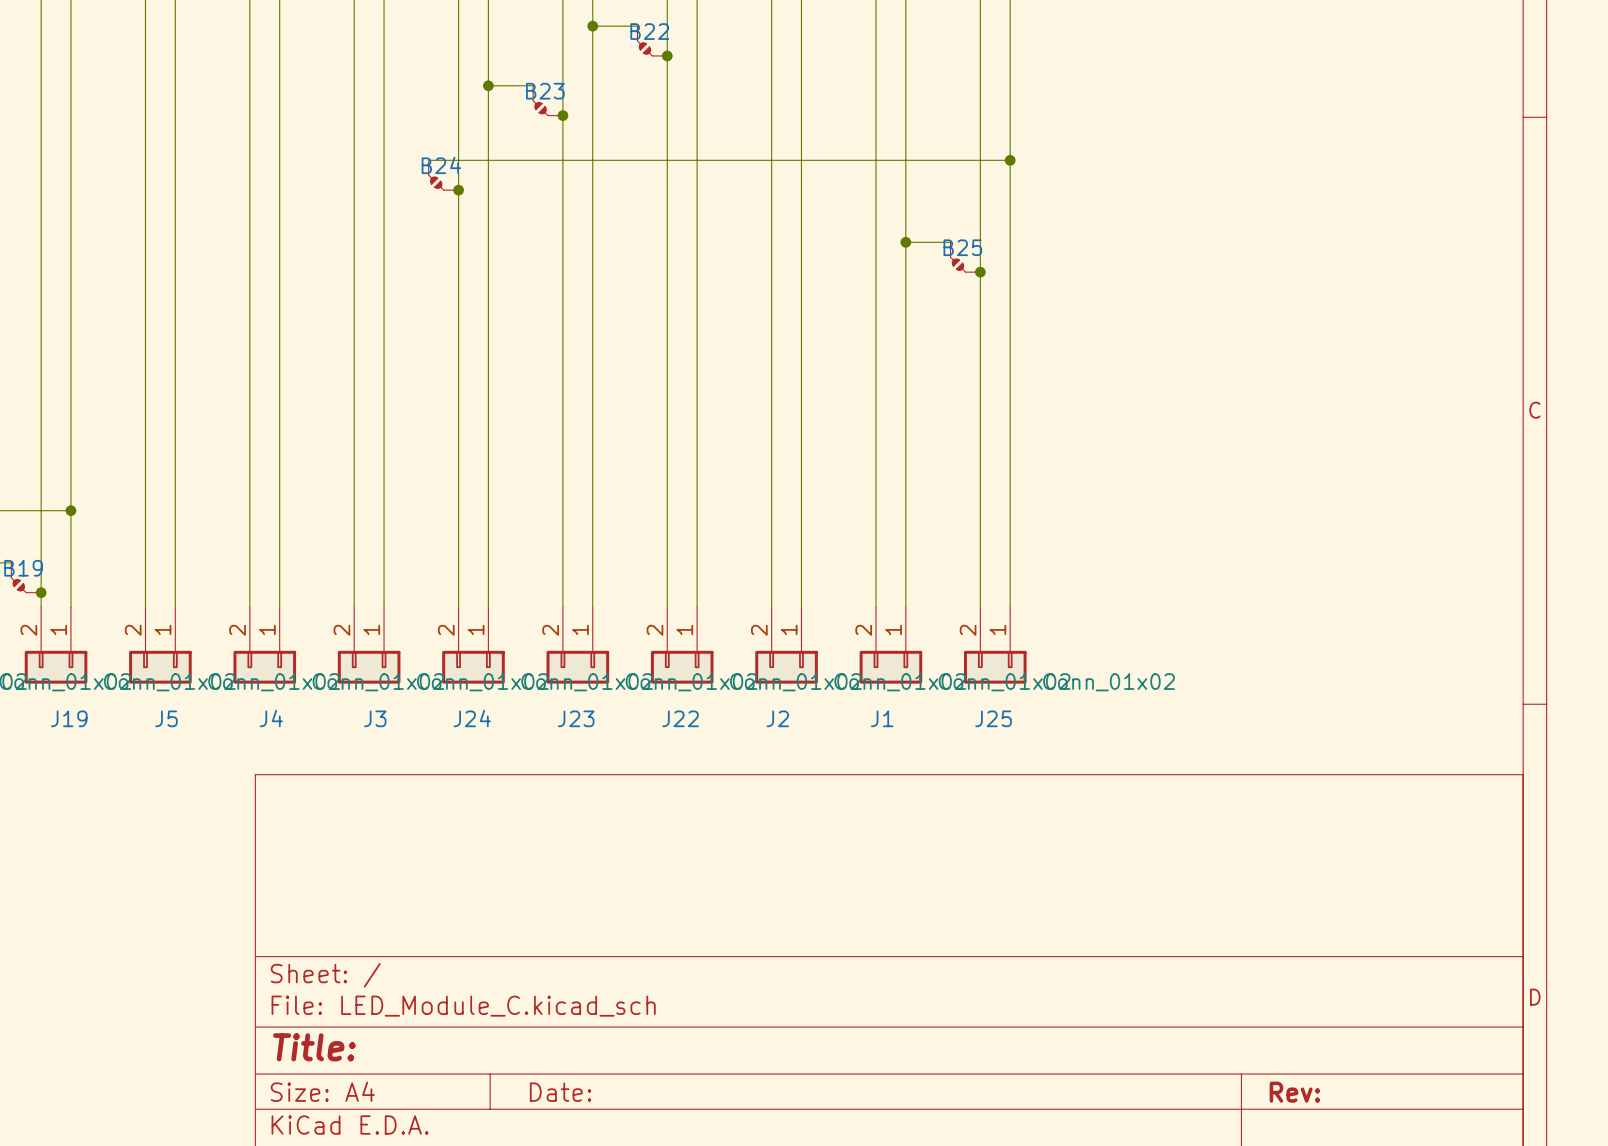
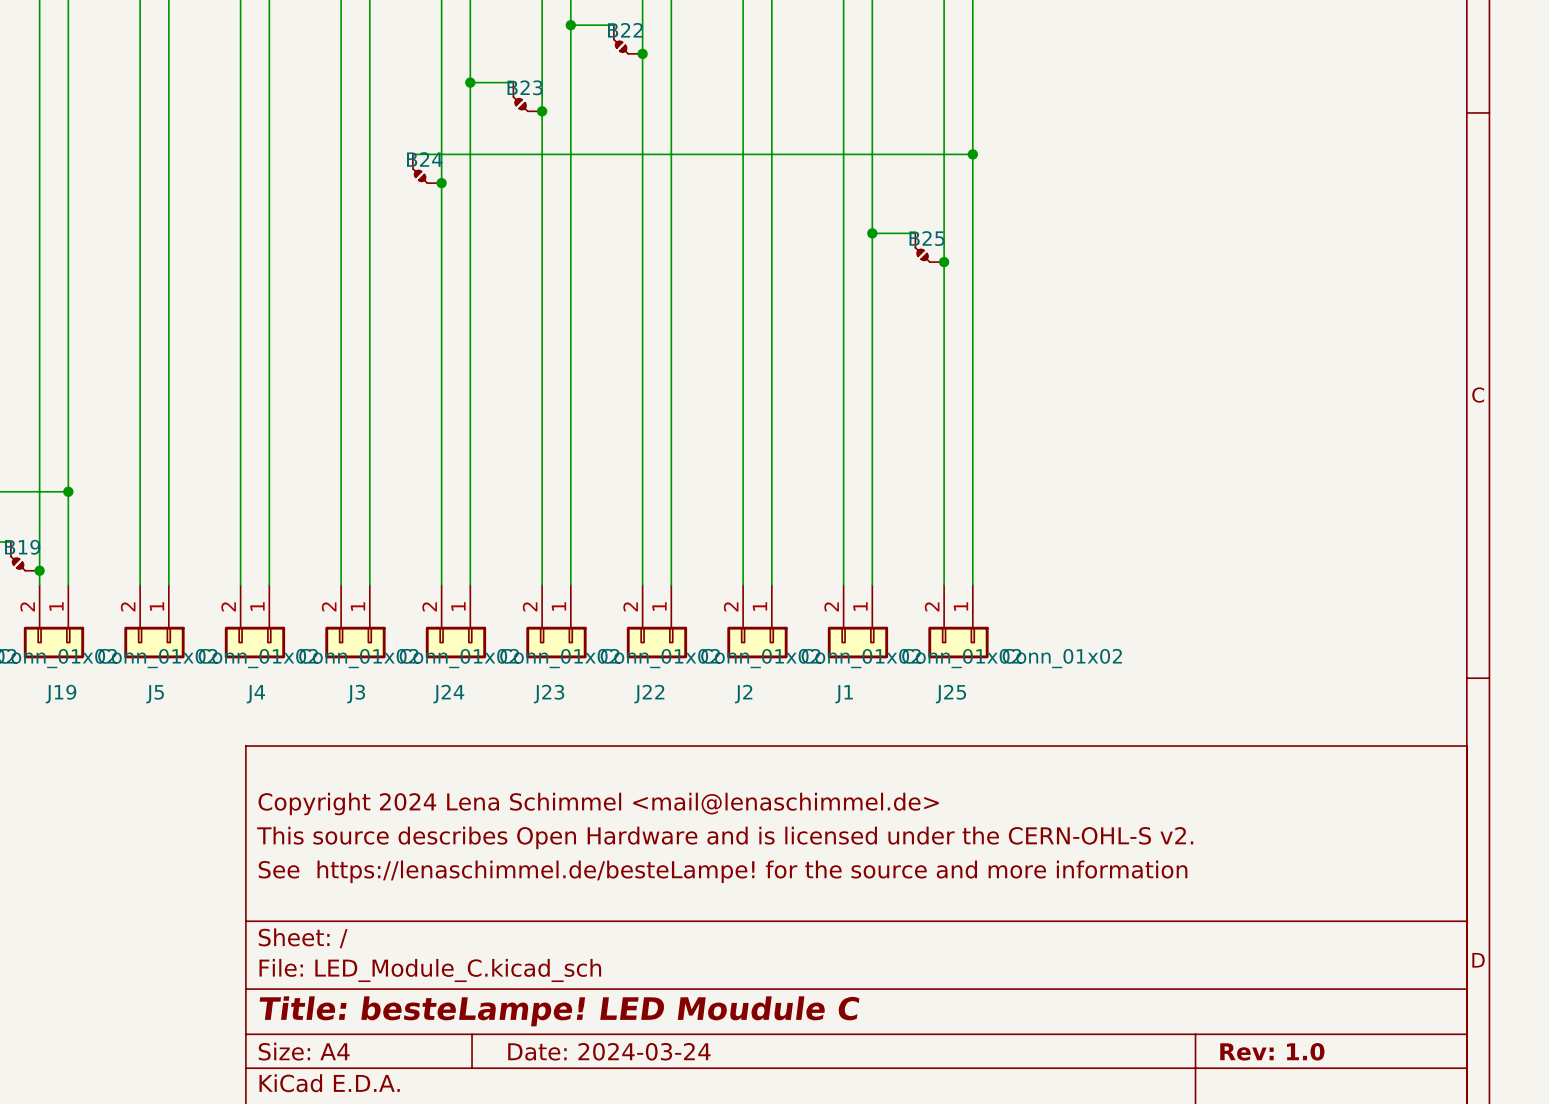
title block: none -> Copyright 2024 Lena Schimmel <mail@lenaschimmel.de> (598, 803)
title block: none -> This source describes Open Hardware and is licensed under the CERN-OHL-S v2. (725, 837)
title block: none -> See https://lenaschimmel.de/besteLampe! for the source and more information (723, 871)
title block: Title: (314, 1047) -> Title: besteLampe! LED Moudule C (559, 1011)
title block: Date: (560, 1092) -> Date: 2024-03-24 (609, 1051)
title block: Rev: (1294, 1092) -> Rev: 1.0 (1272, 1051)

